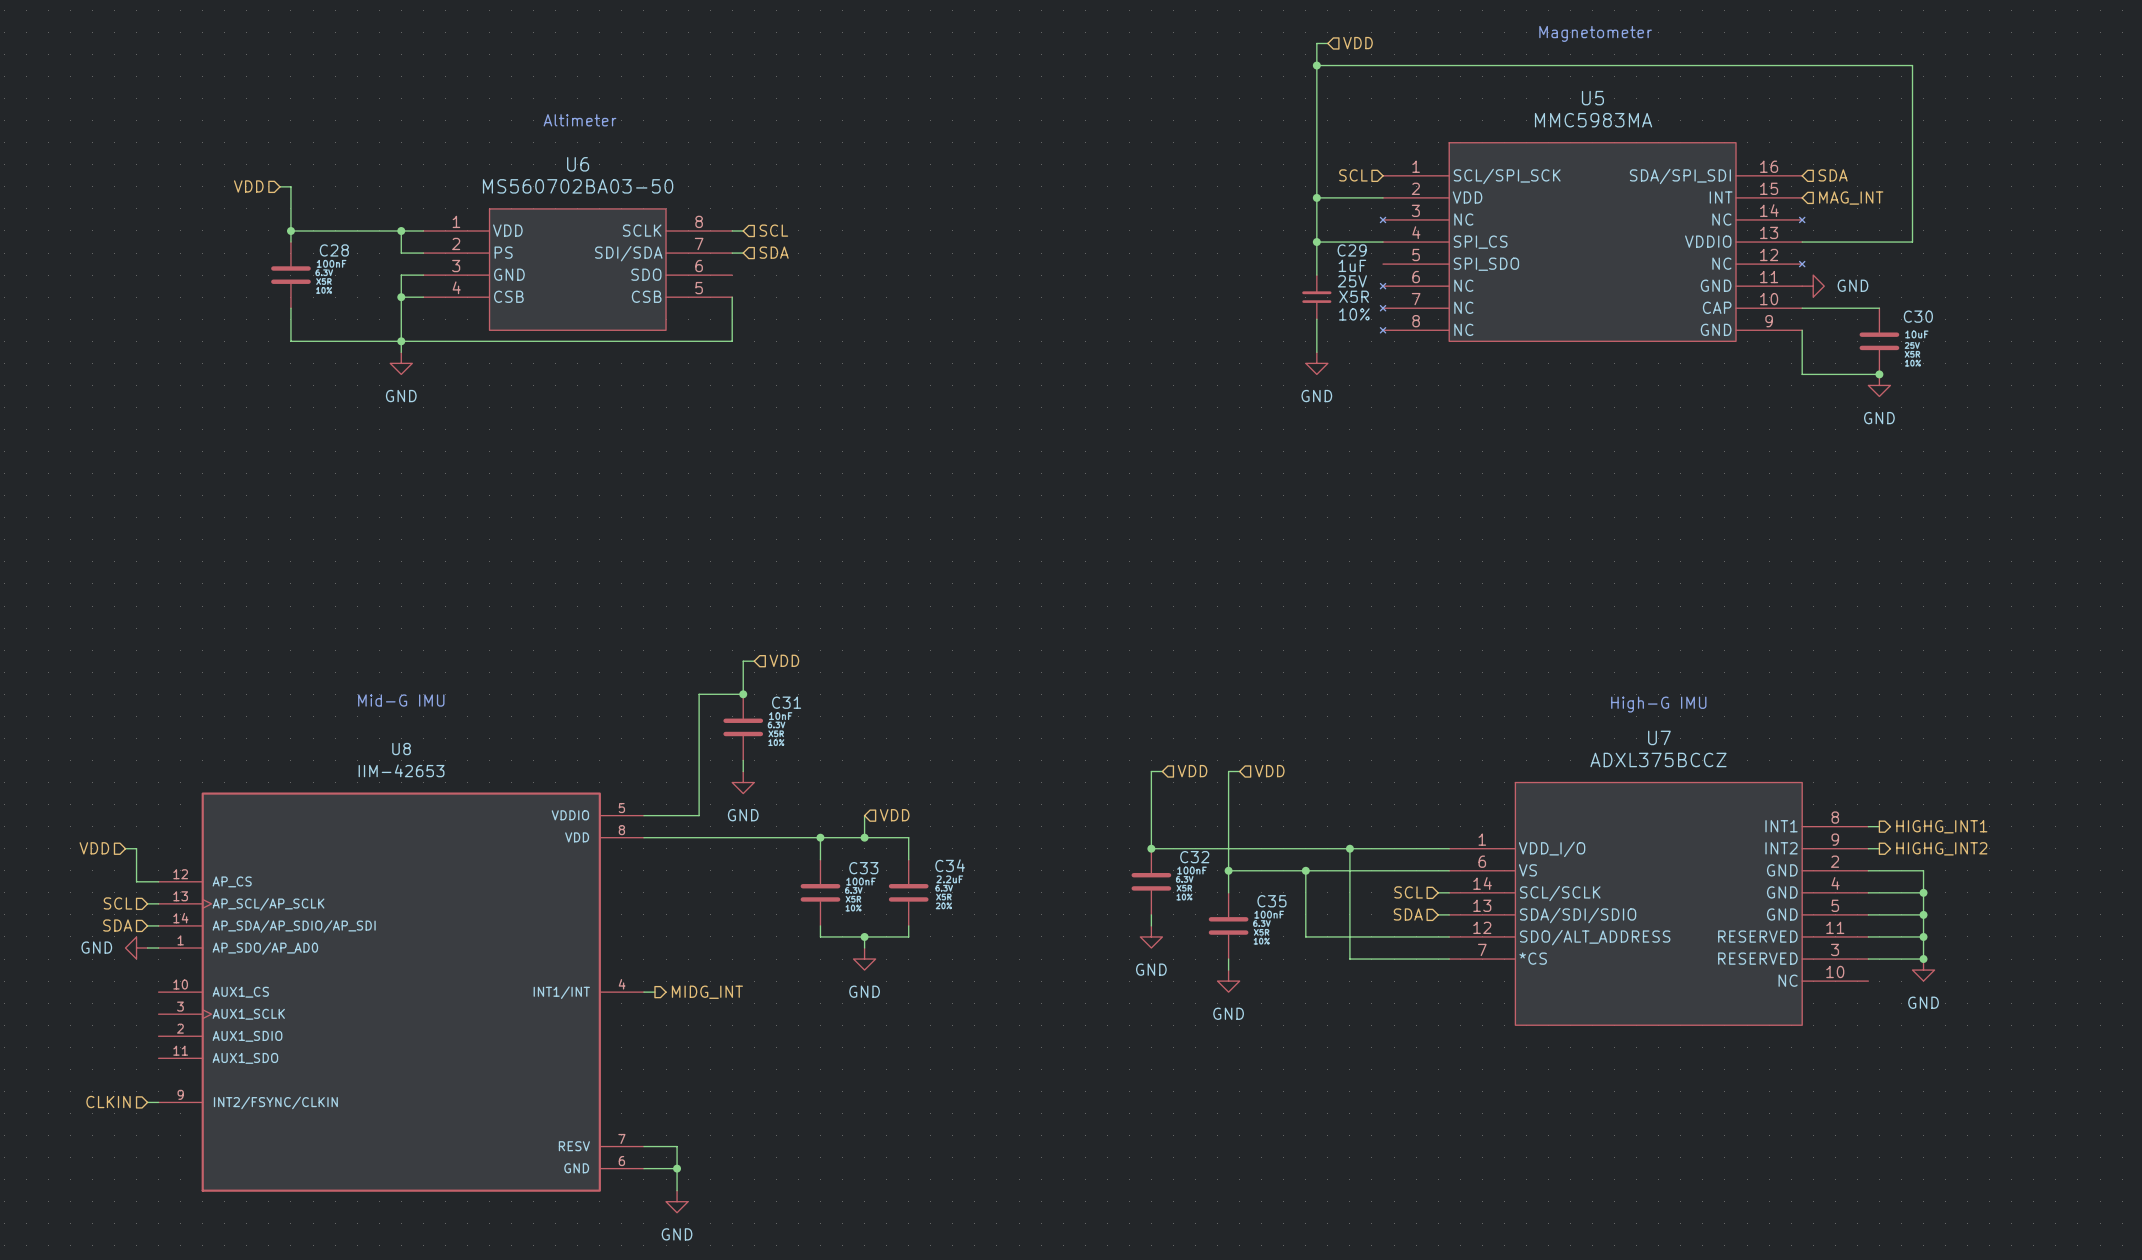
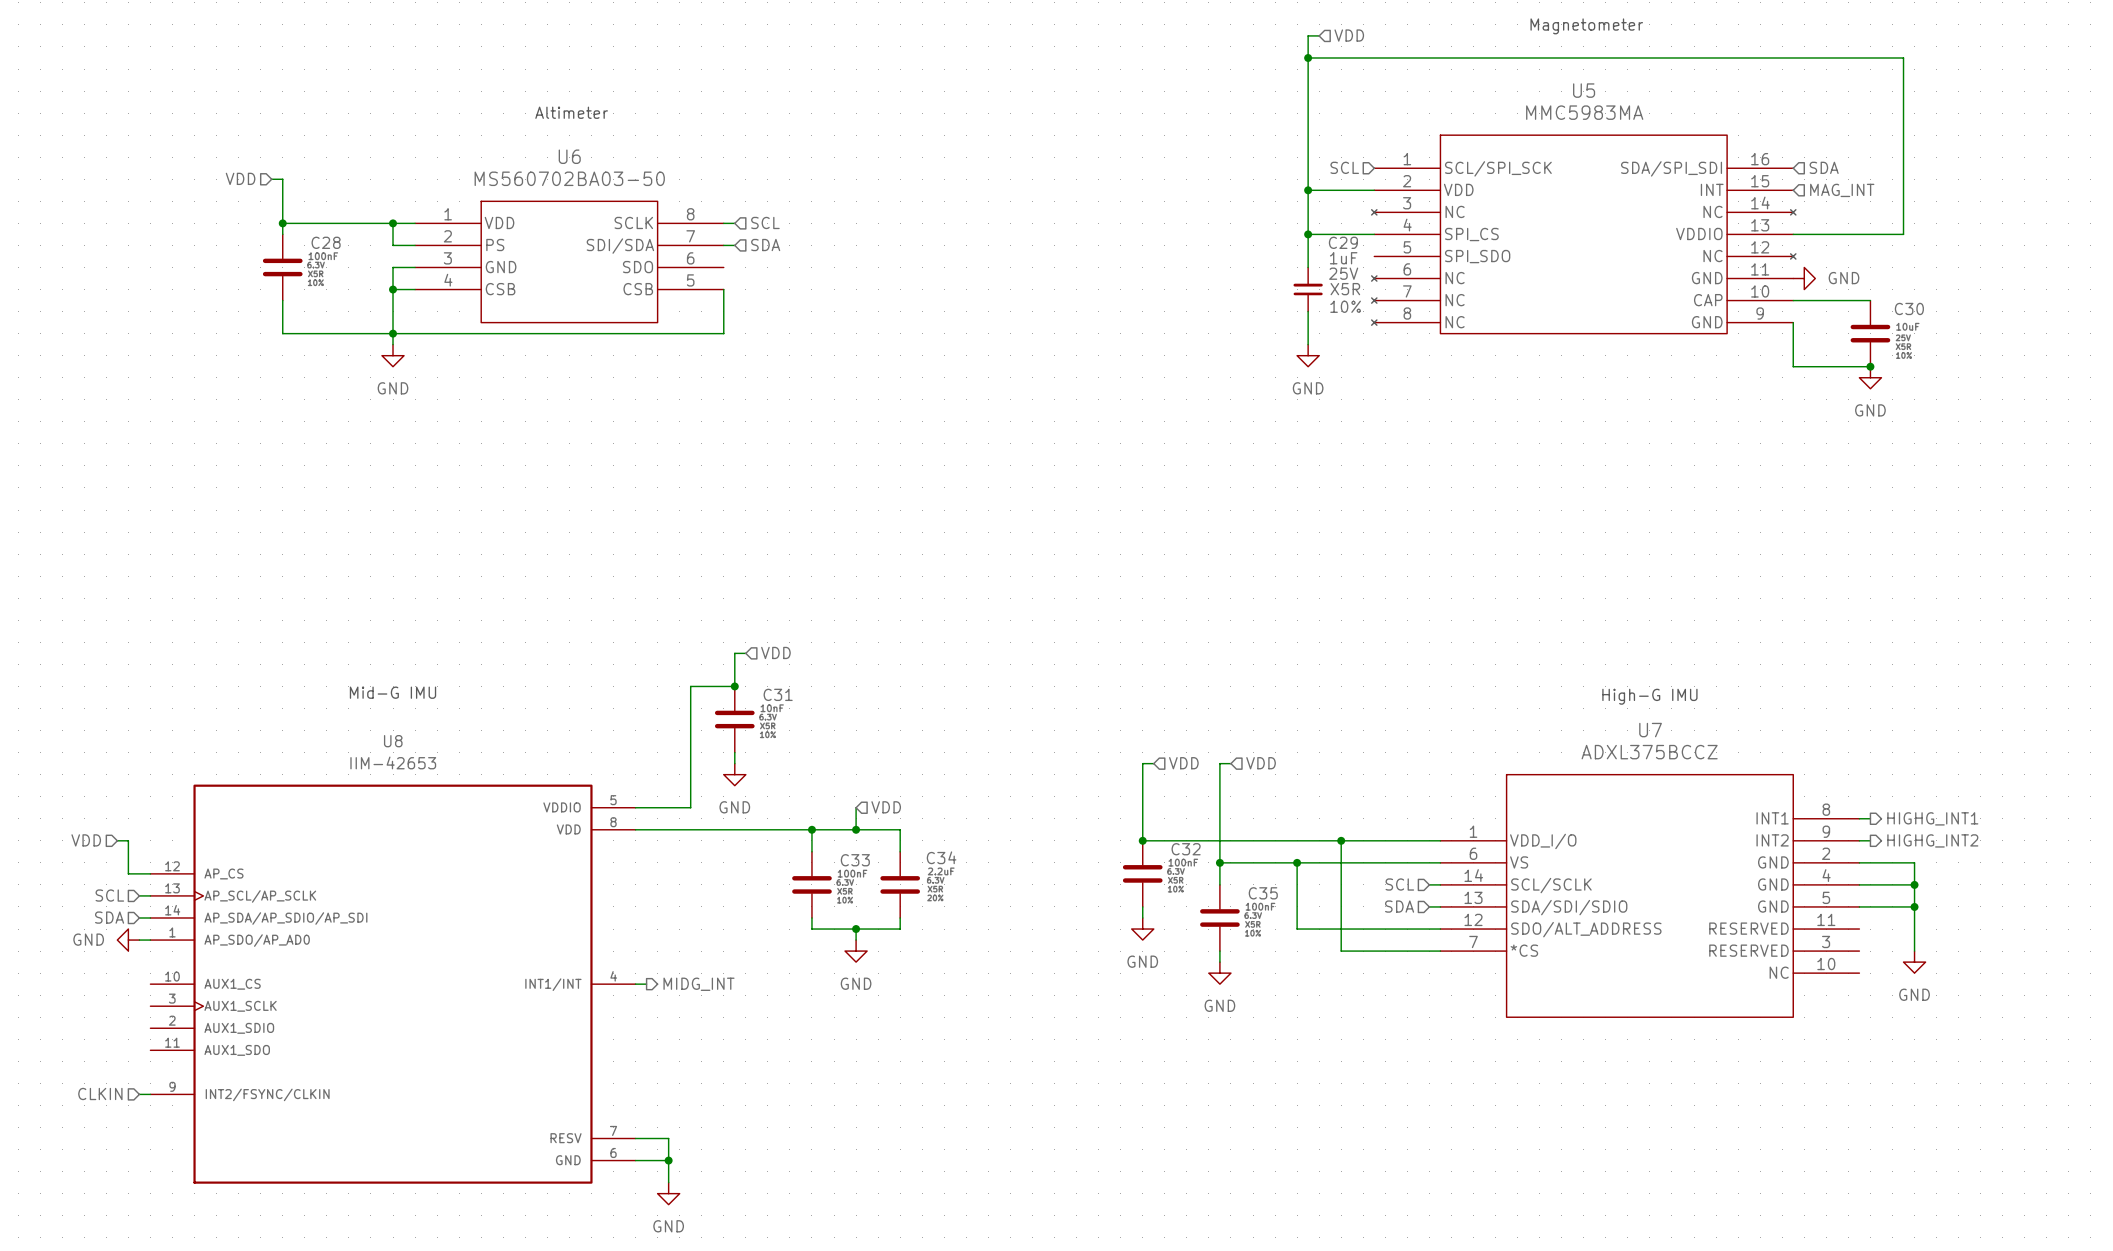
wire: (1868, 936) (1923, 936) -> none
junction: (1923, 936) -> none
wire: (1868, 959) (1923, 959) -> none
junction: (1923, 959) -> none

